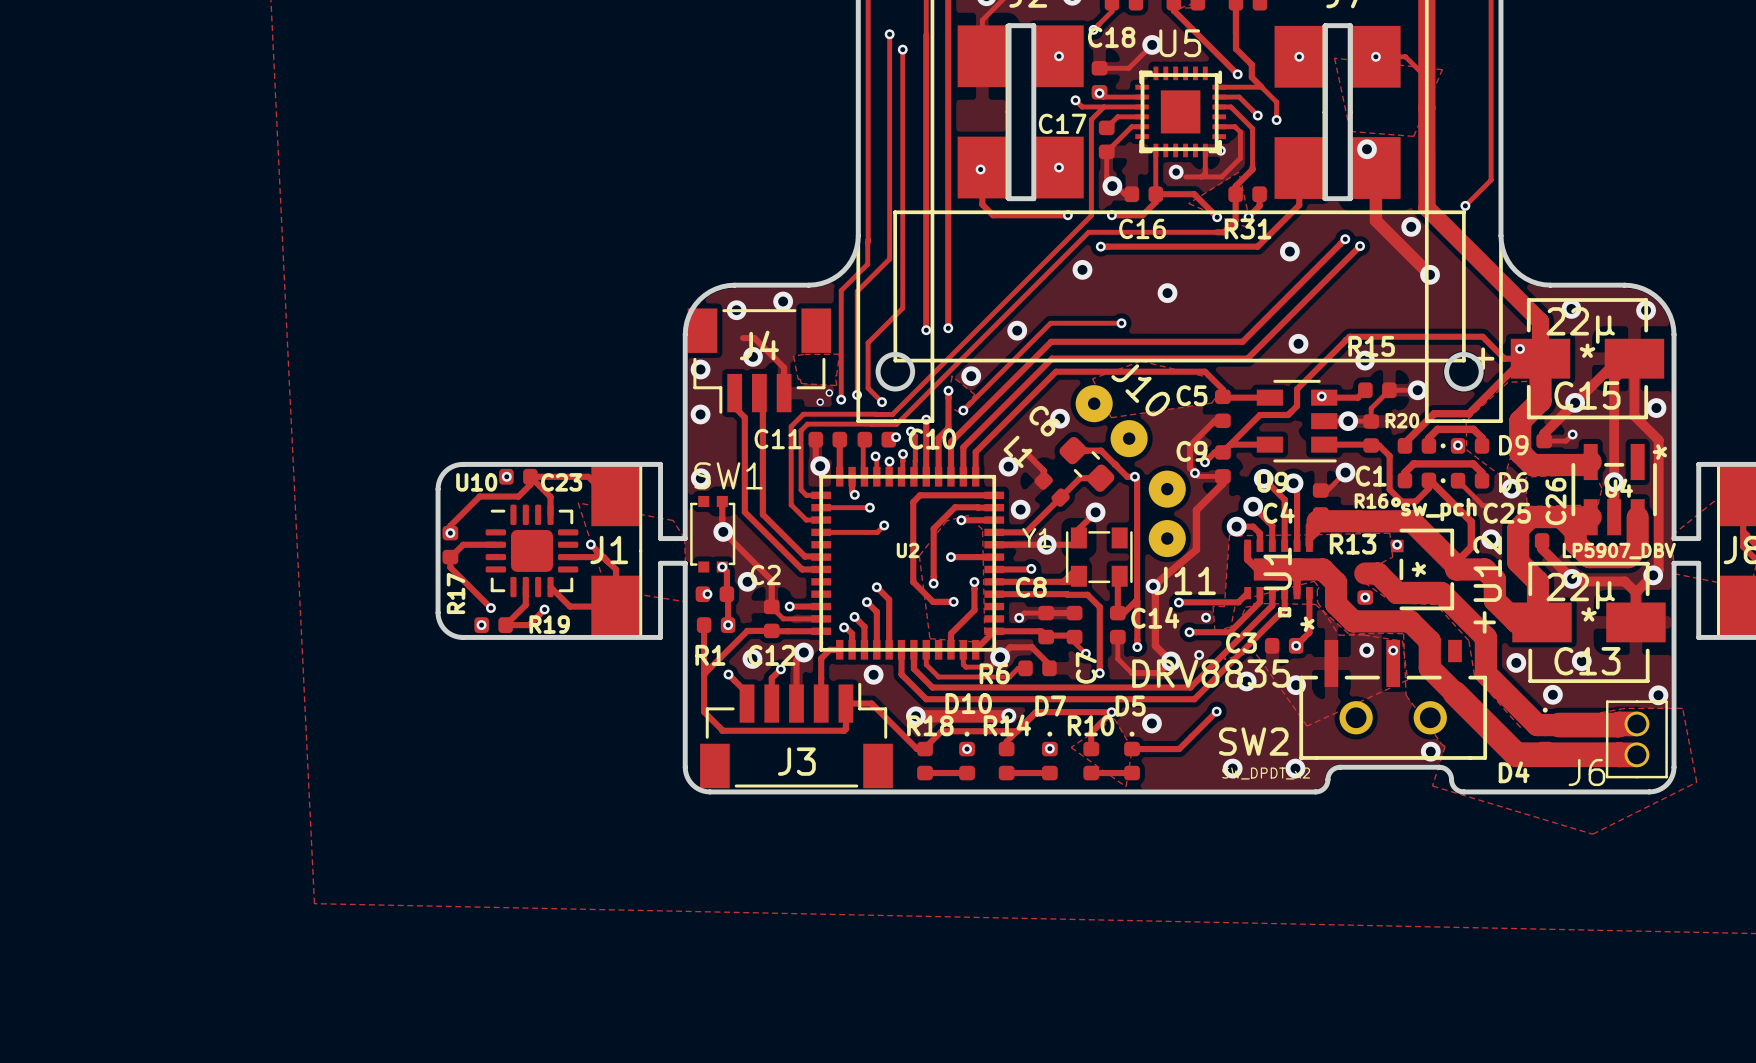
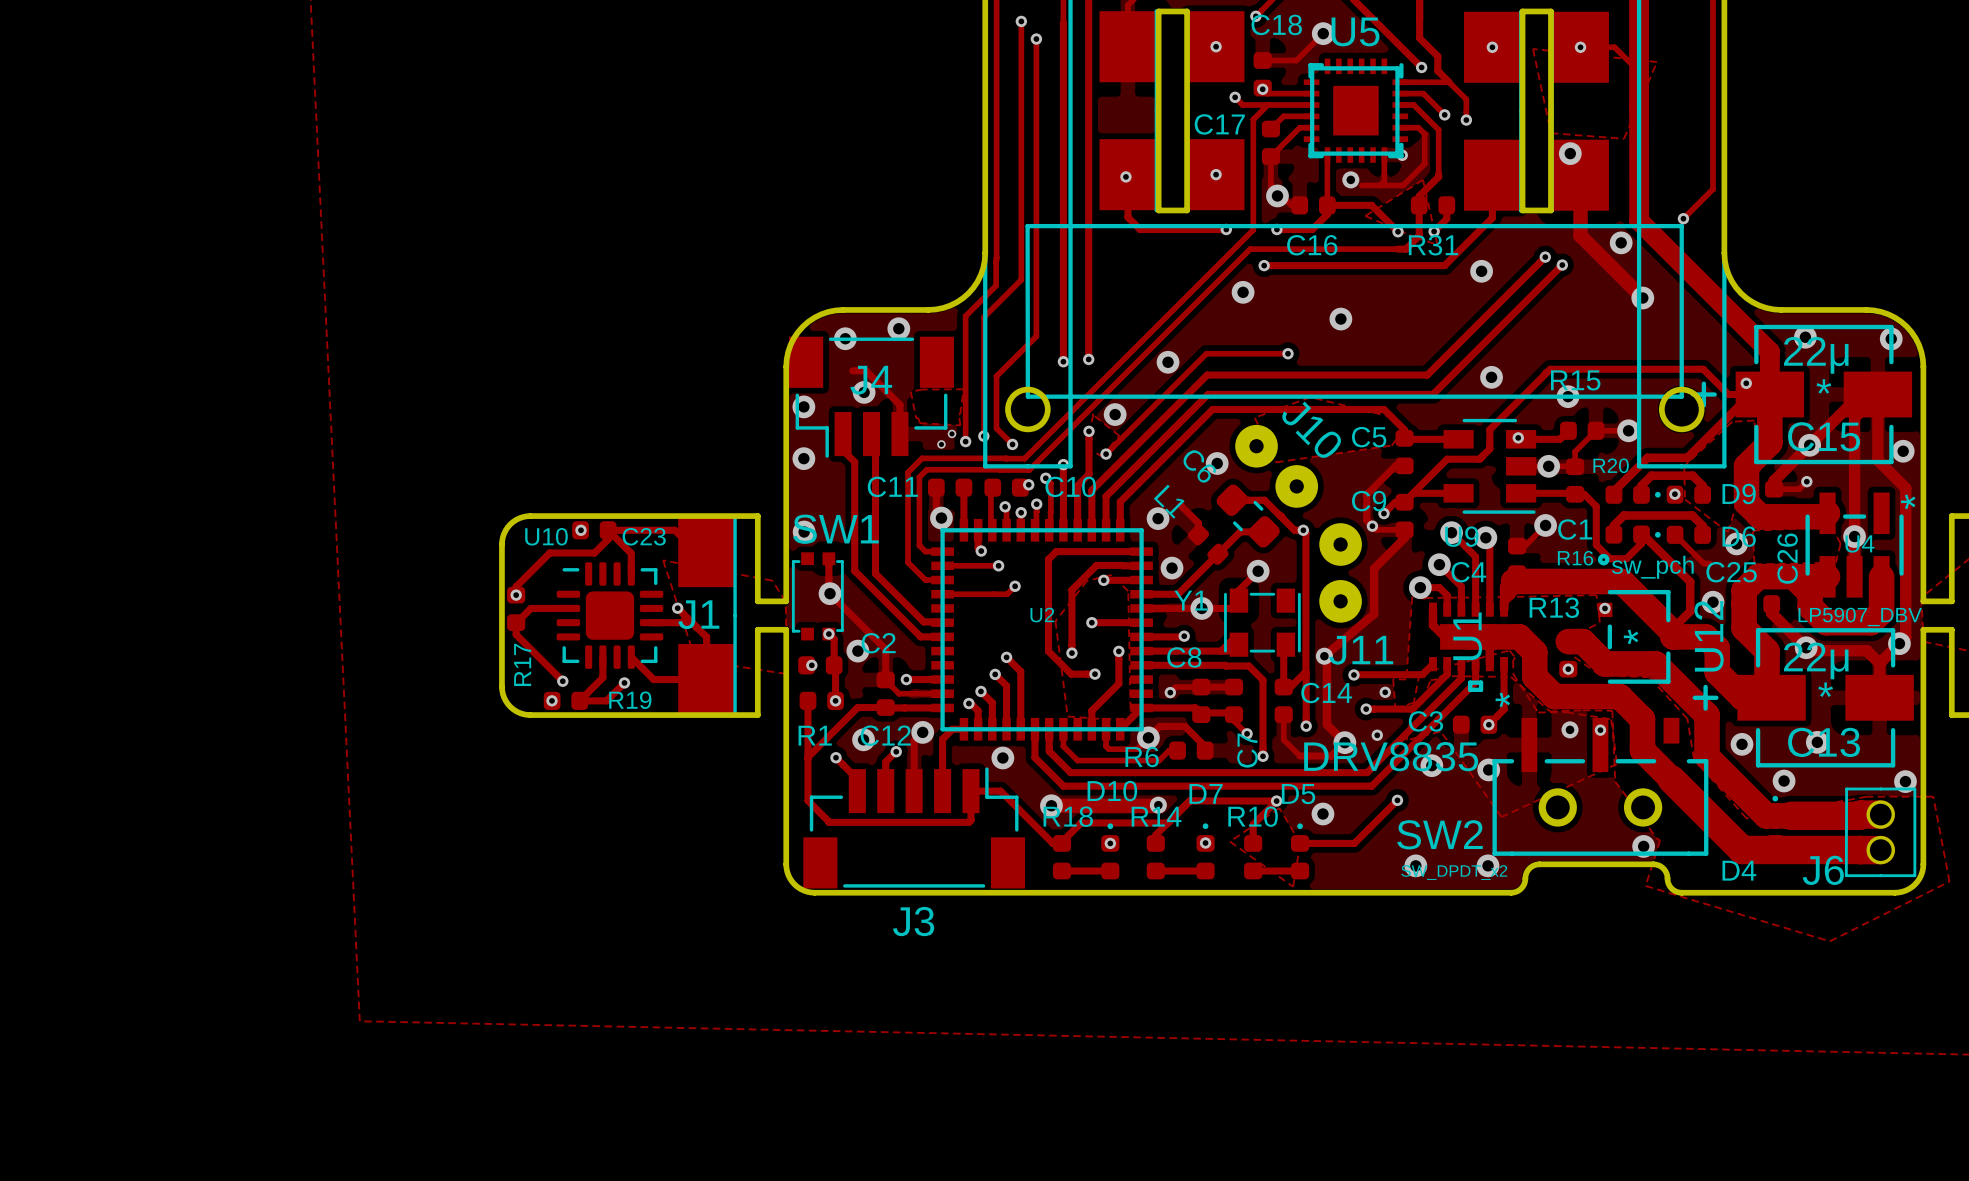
J3 name position: J3 (796, 761) -> J3 (913, 921)

